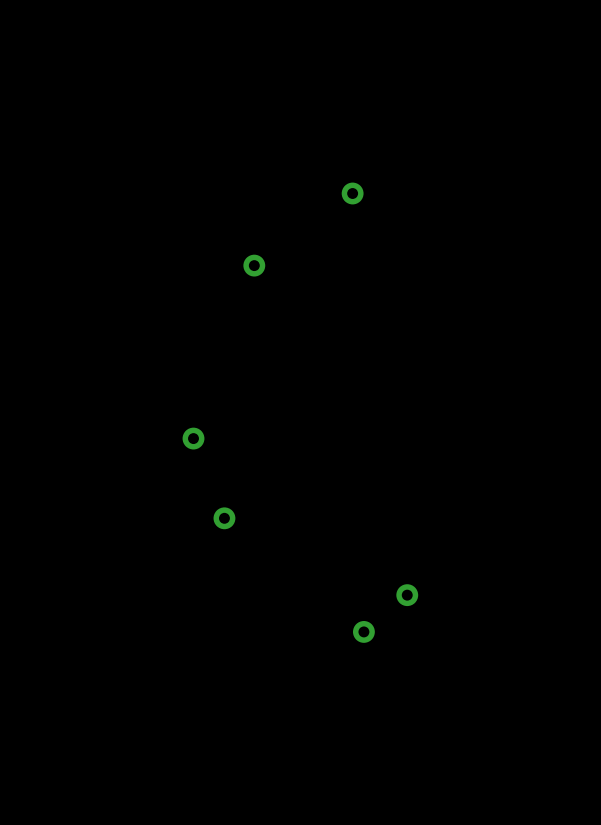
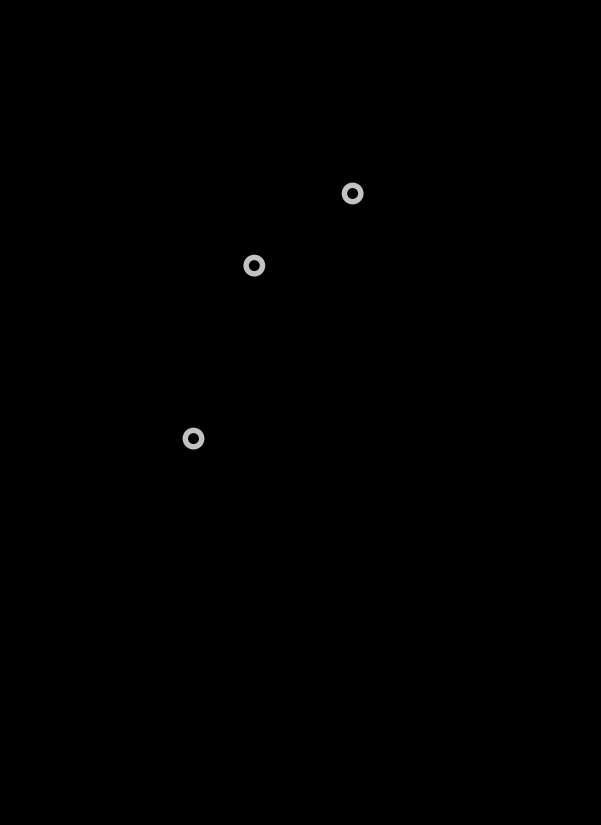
via: (224, 518) -> none
via: (407, 595) -> none
via: (363, 631) -> none

